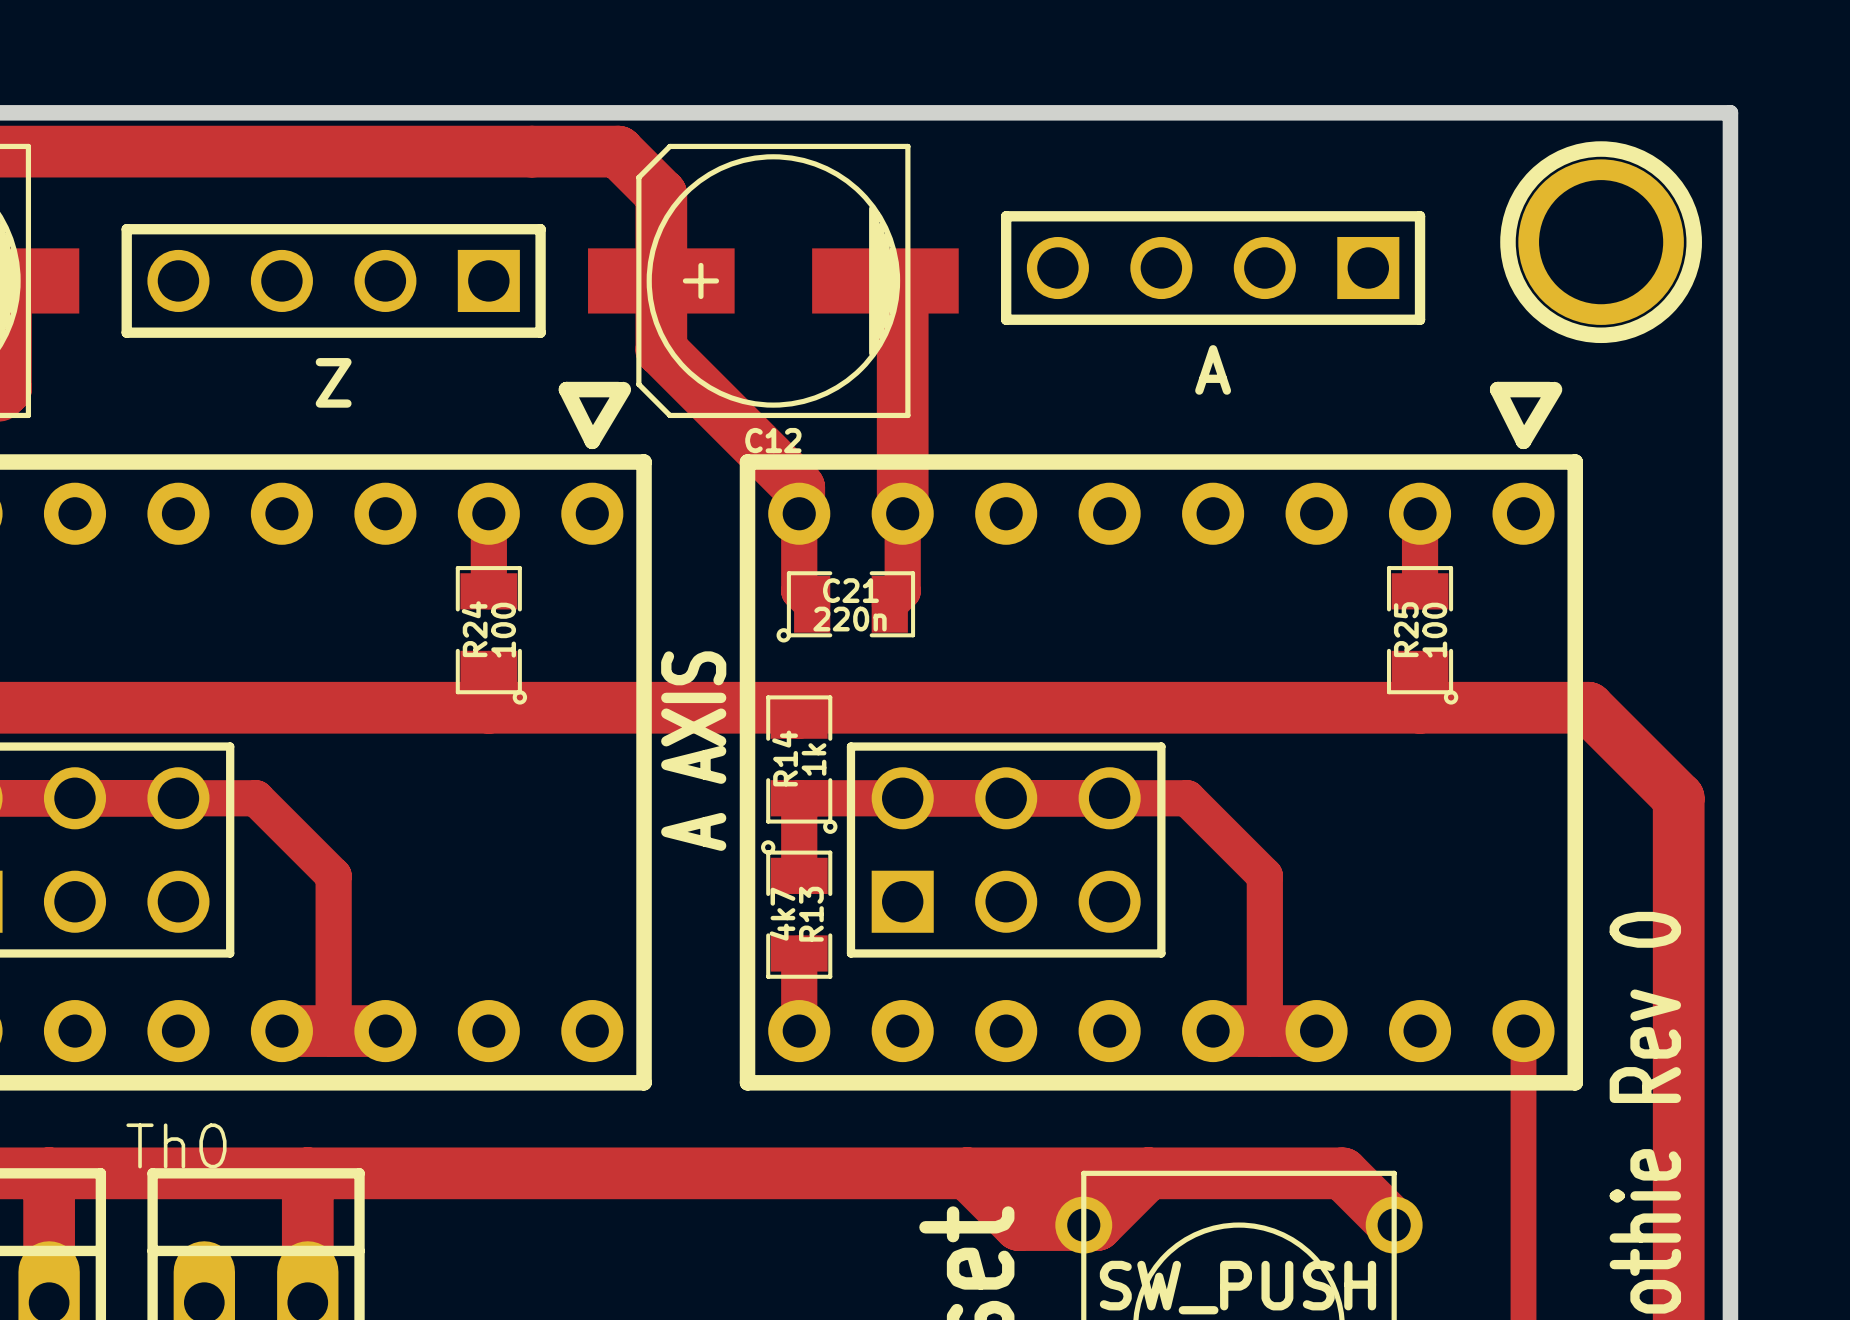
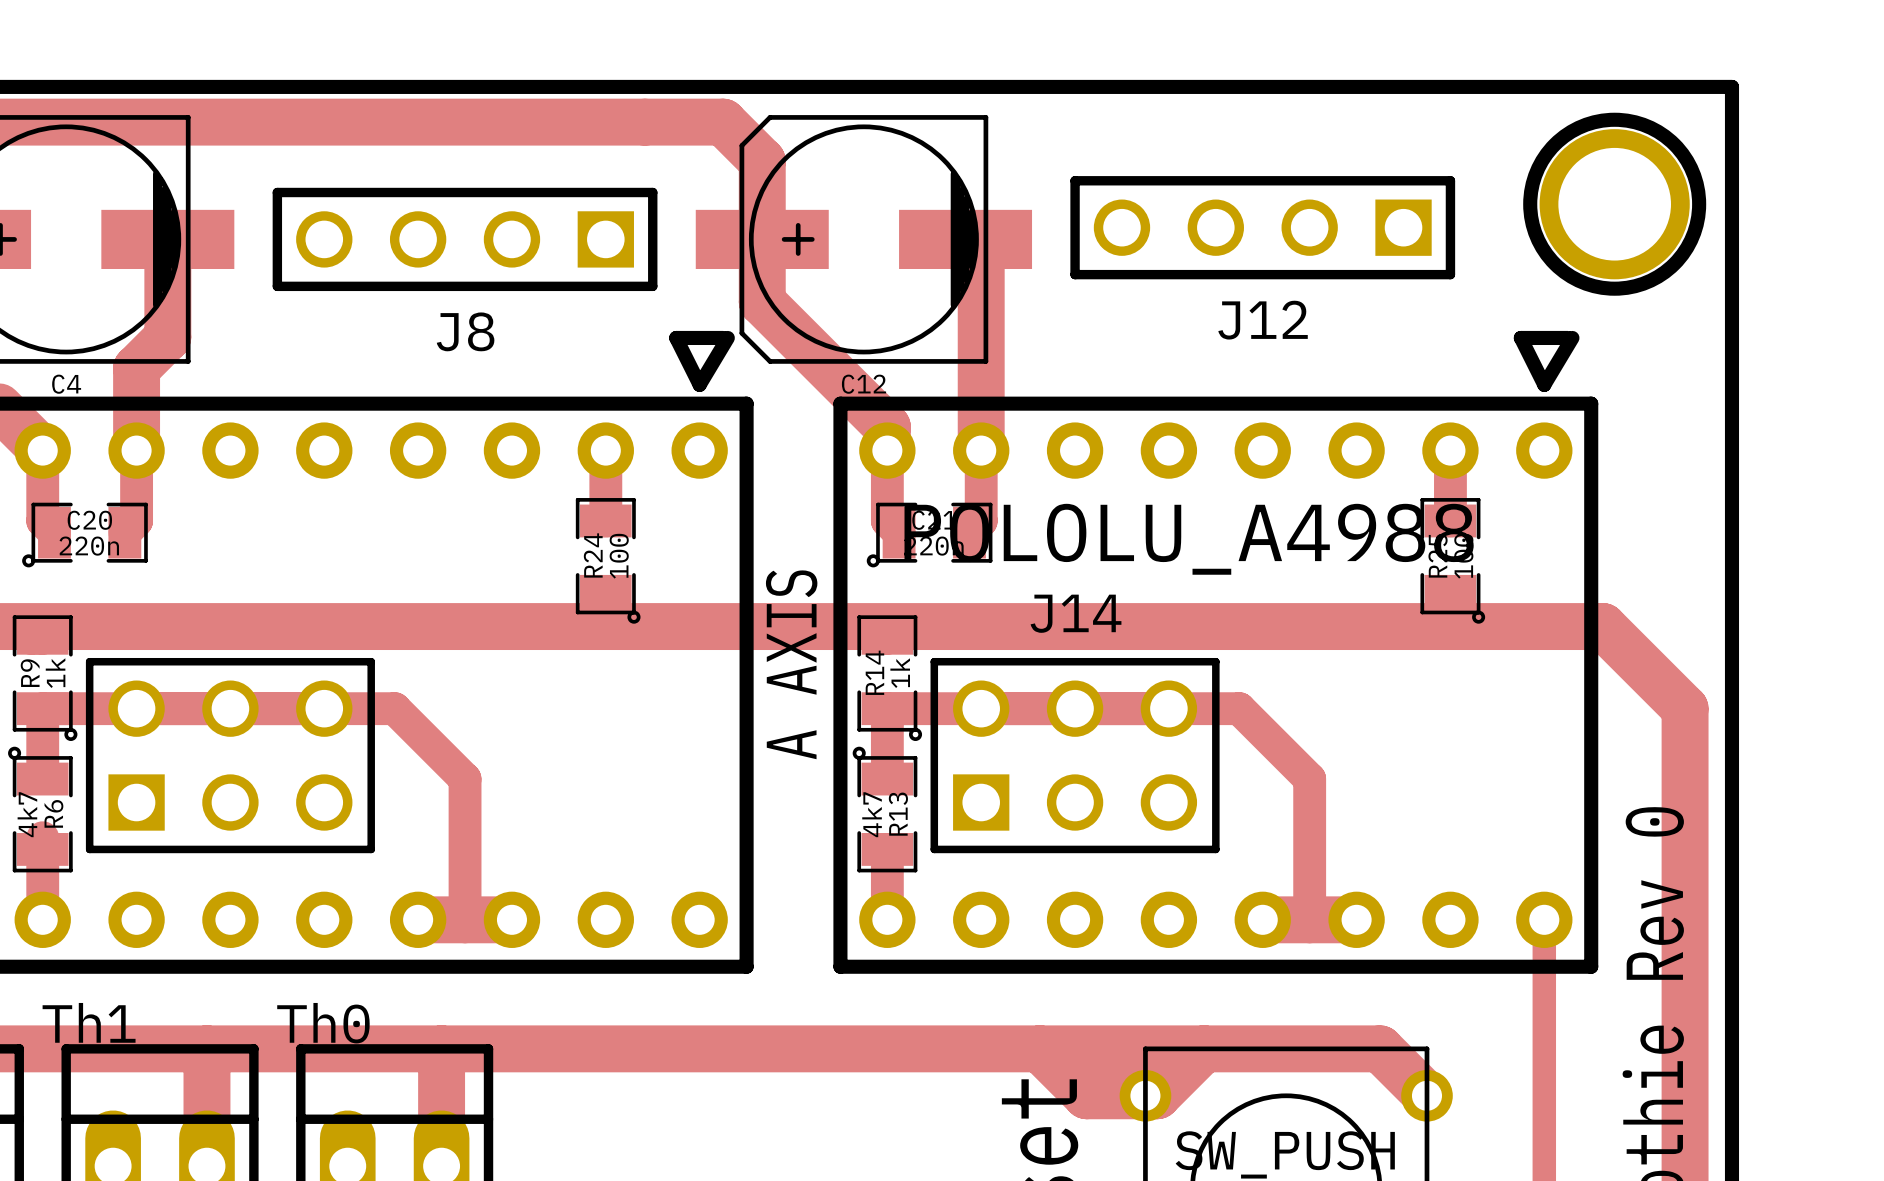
A name: A (1213, 369) -> J12 (1263, 320)
Z name: Z (333, 382) -> J8 (465, 331)
part value: none -> POLOLU_A4988 (1189, 539)
J14 name: none -> J14 (1076, 613)

